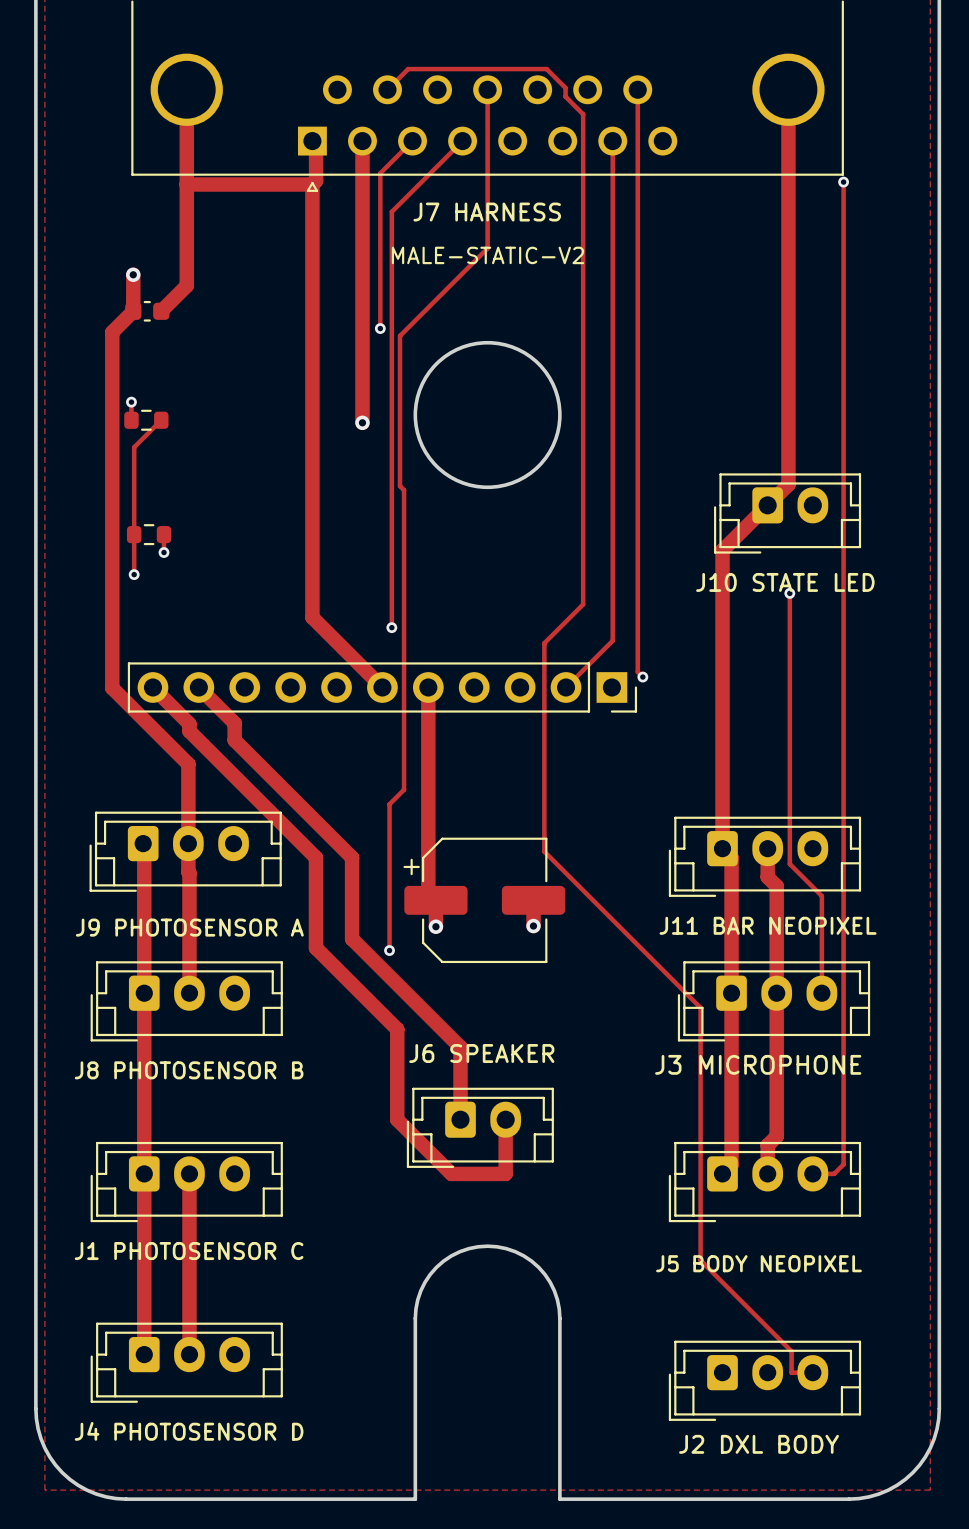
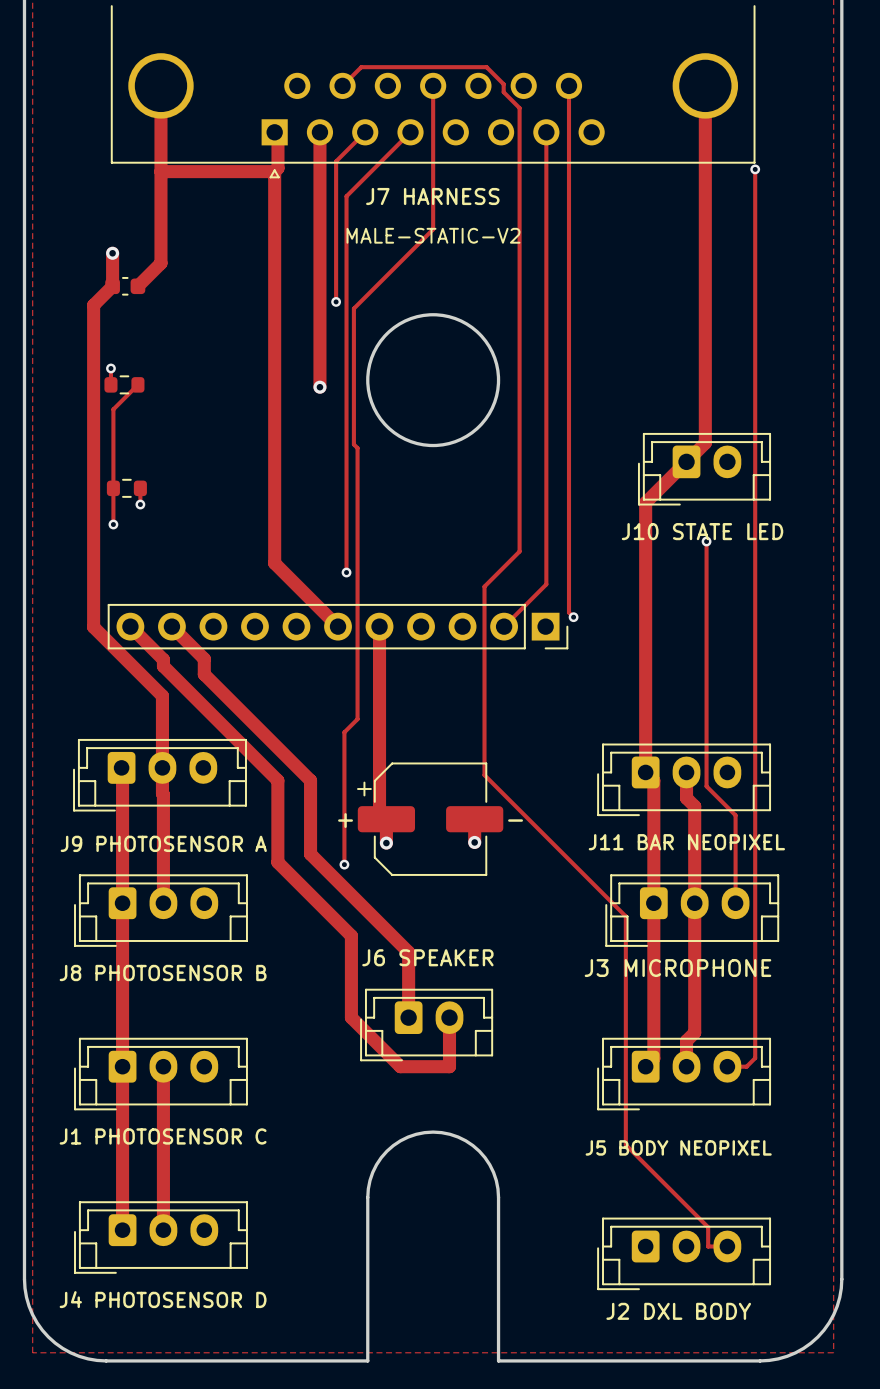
part text: none -> + (345, 820)
part text: none -> - (515, 820)

